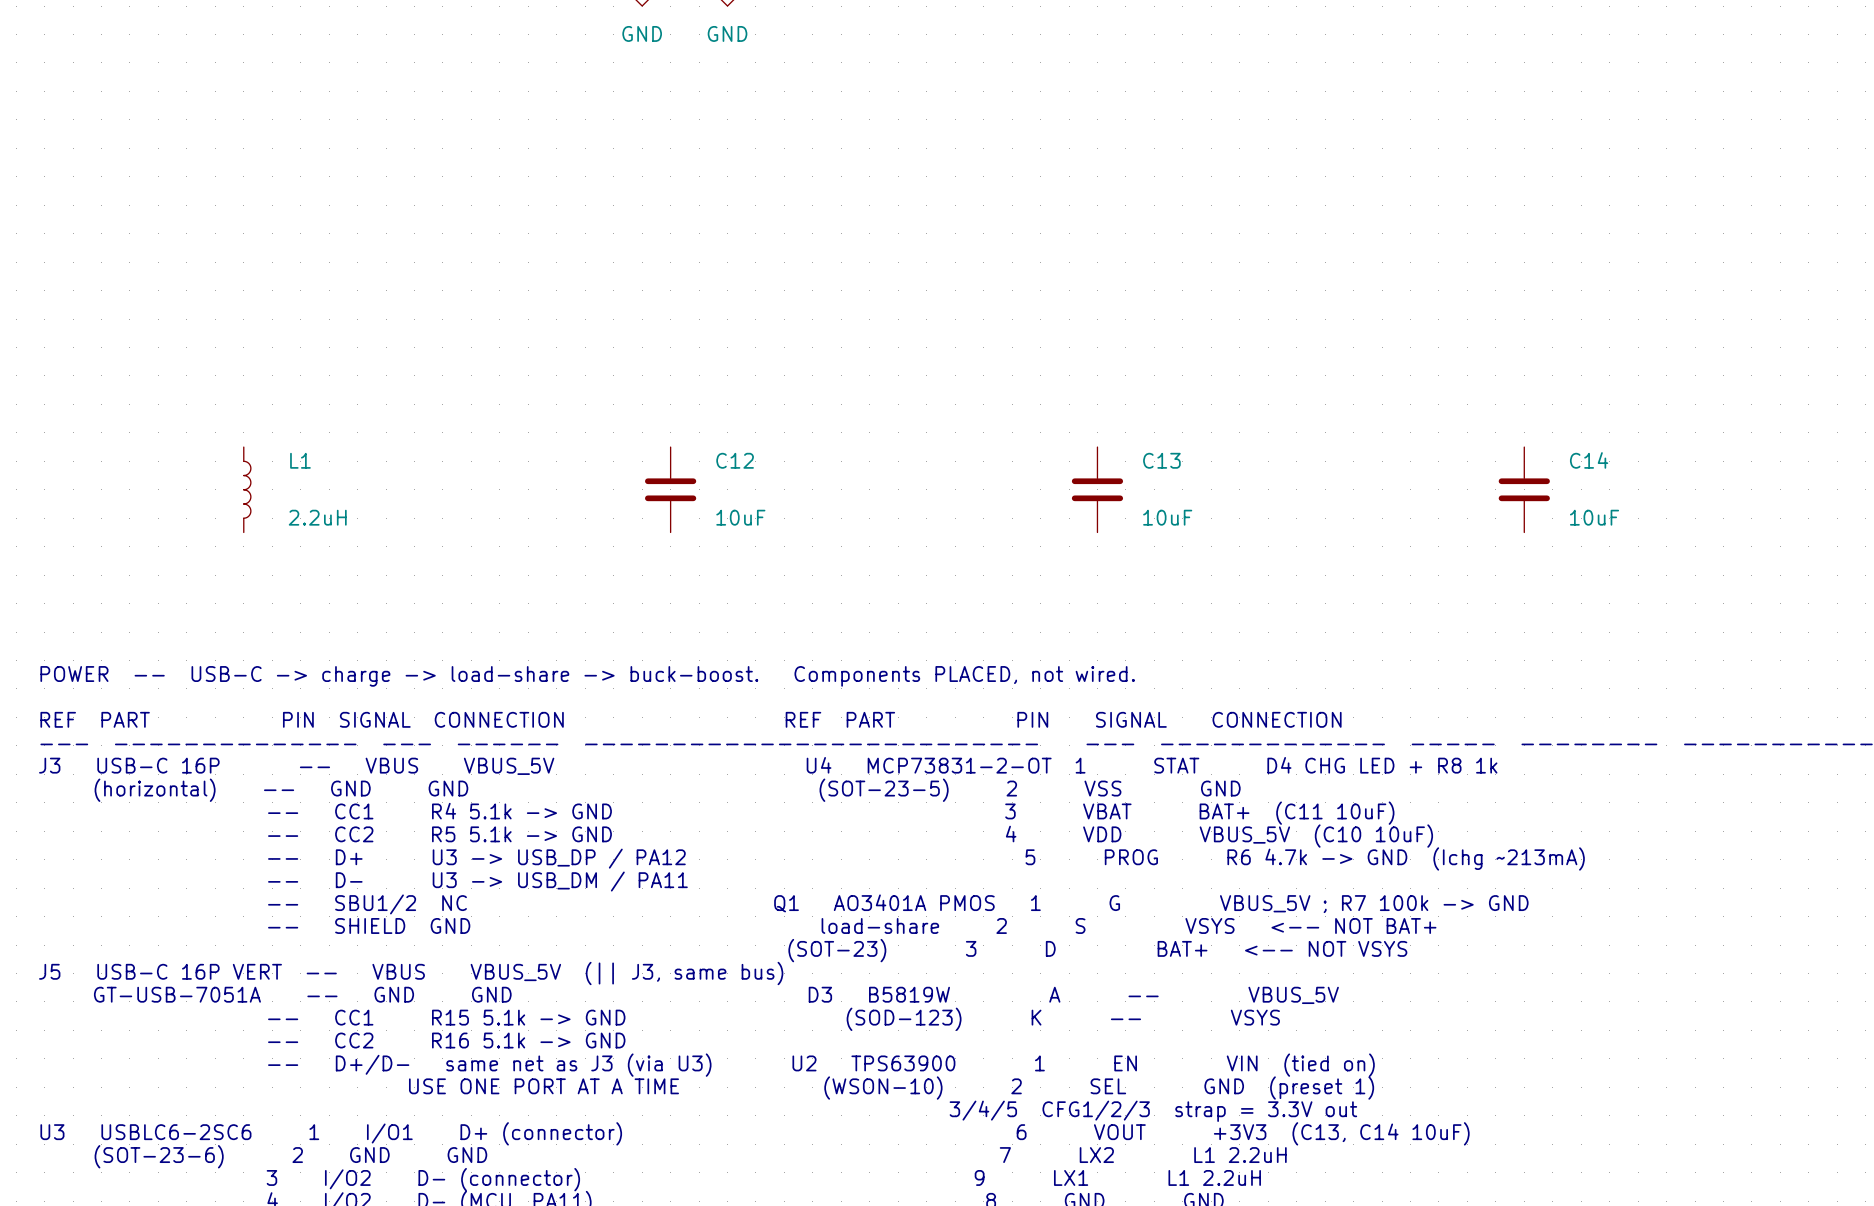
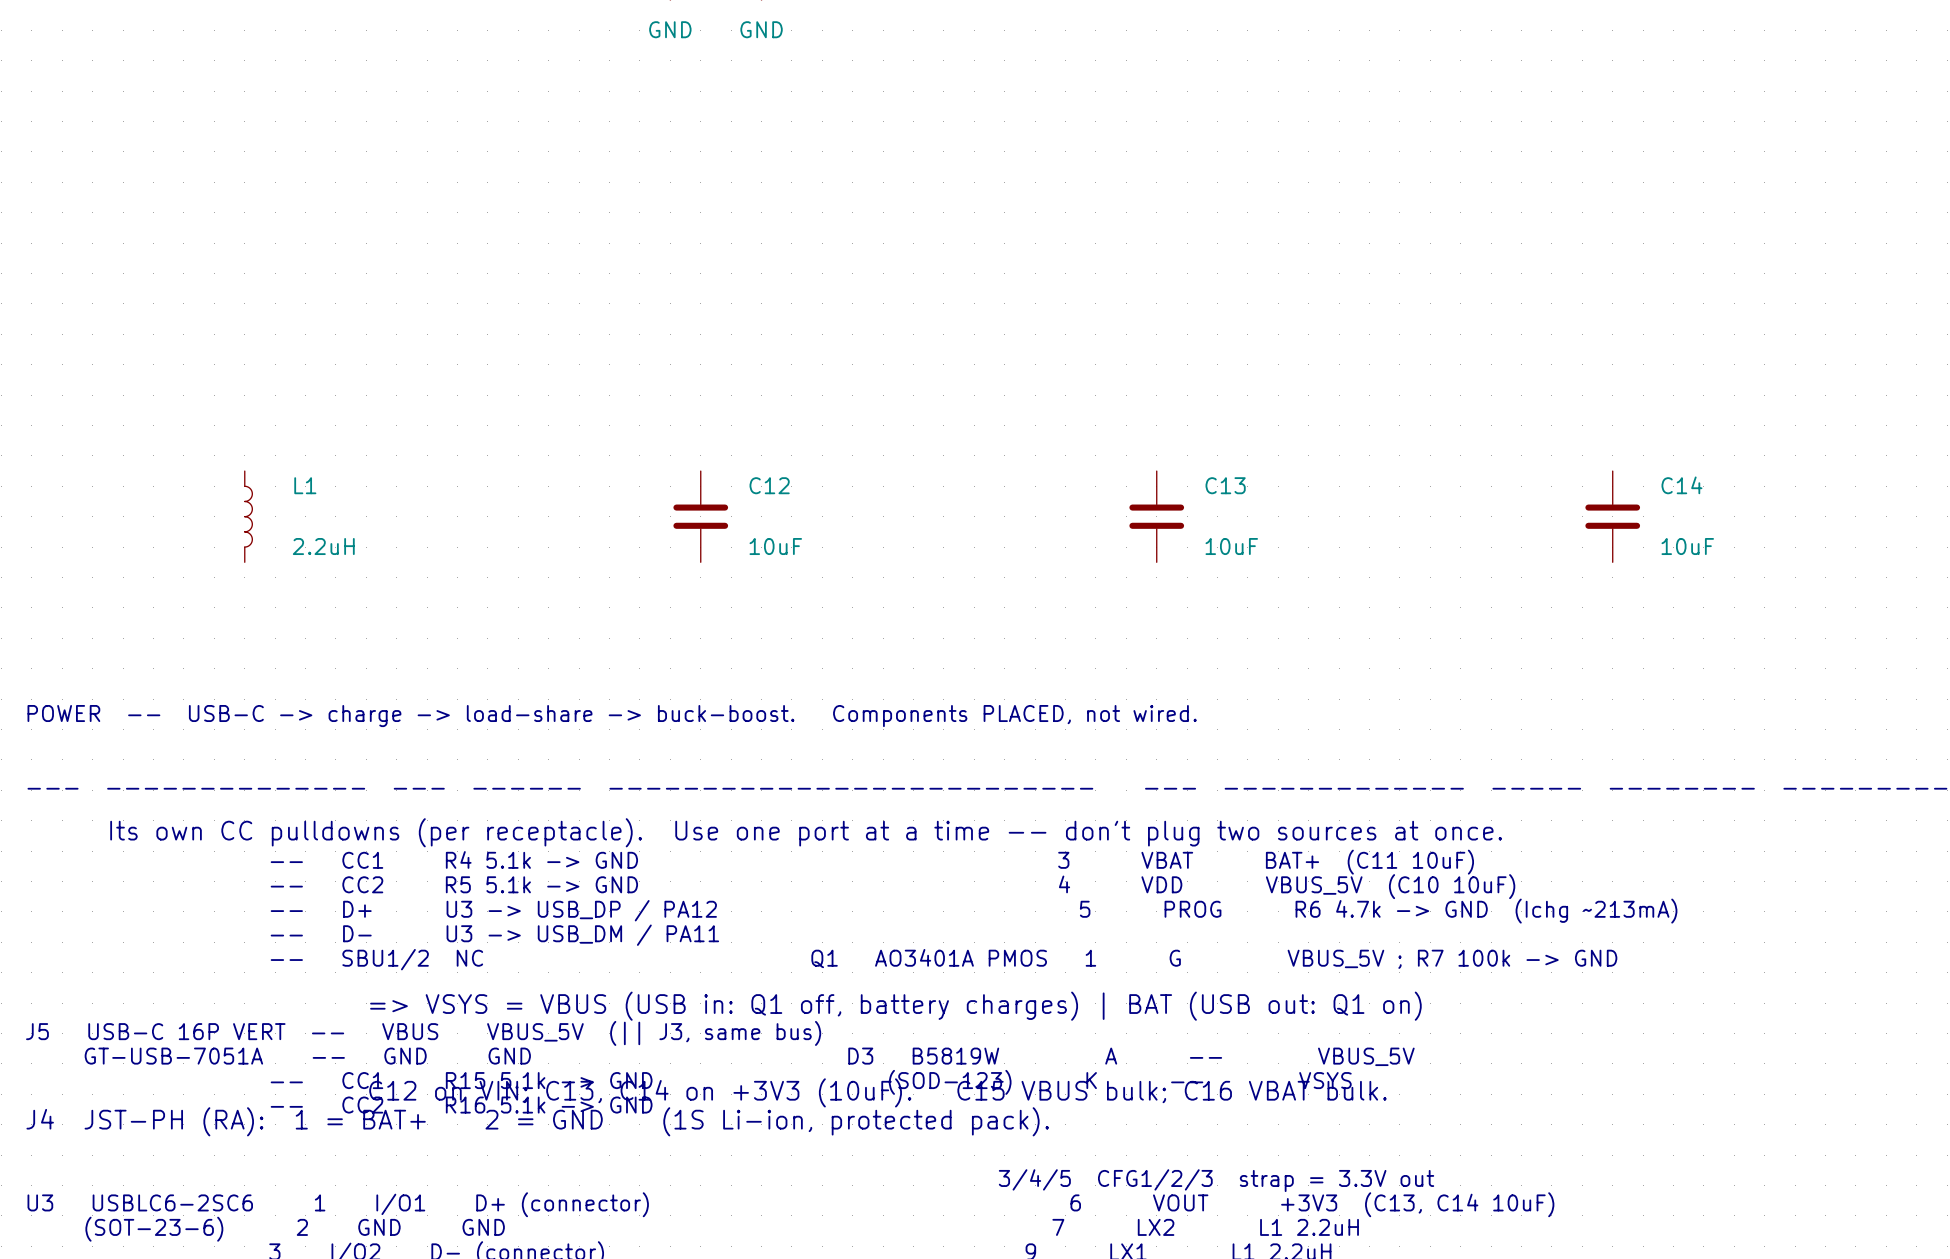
text: REF PART PIN SIGNAL CONNECTION REF PART PIN SIGNAL CONNECTION (691, 719) -> none
text: J3 USB-C 16P -- VBUS VBUS_5V U4 MCP73831-2-OT 1 STAT D4 CHG LED + R8 1k (768, 765) -> none
text: (horizontal) -- GND GND (SOT-23-5) 2 VSS GND (667, 790) -> Its own CC pulldowns (per receptacle). Use one port at a time -- don't plug two sources at once. (806, 832)
text: -- SHIELD GND load-share 2 S VSYS <-- NOT BAT+ (852, 925) -> none
text: (SOT-23) 3 D BAT+ <-- NOT VSYS (1097, 950) -> => VSYS = VBUS (USB in: Q1 off, battery charges) | BAT (USB out: Q1 on) (895, 1006)
text: none -> C12 on VIN; C13, C14 on +3V3 (10uF). C15 VBUS bulk; C16 VBAT bulk. (877, 1092)
text: -- D+/D- same net as J3 (via U3) U2 TPS63900 1 EN VIN (tied on) (821, 1065) -> J4 JST-PH (RA): 1 = BAT+ 2 = GND (1S Li-ion, protected pack). (537, 1121)
text: USE ONE PORT AT A TIME (WSON-10) 2 SEL GND (preset 1) (891, 1088) -> none

